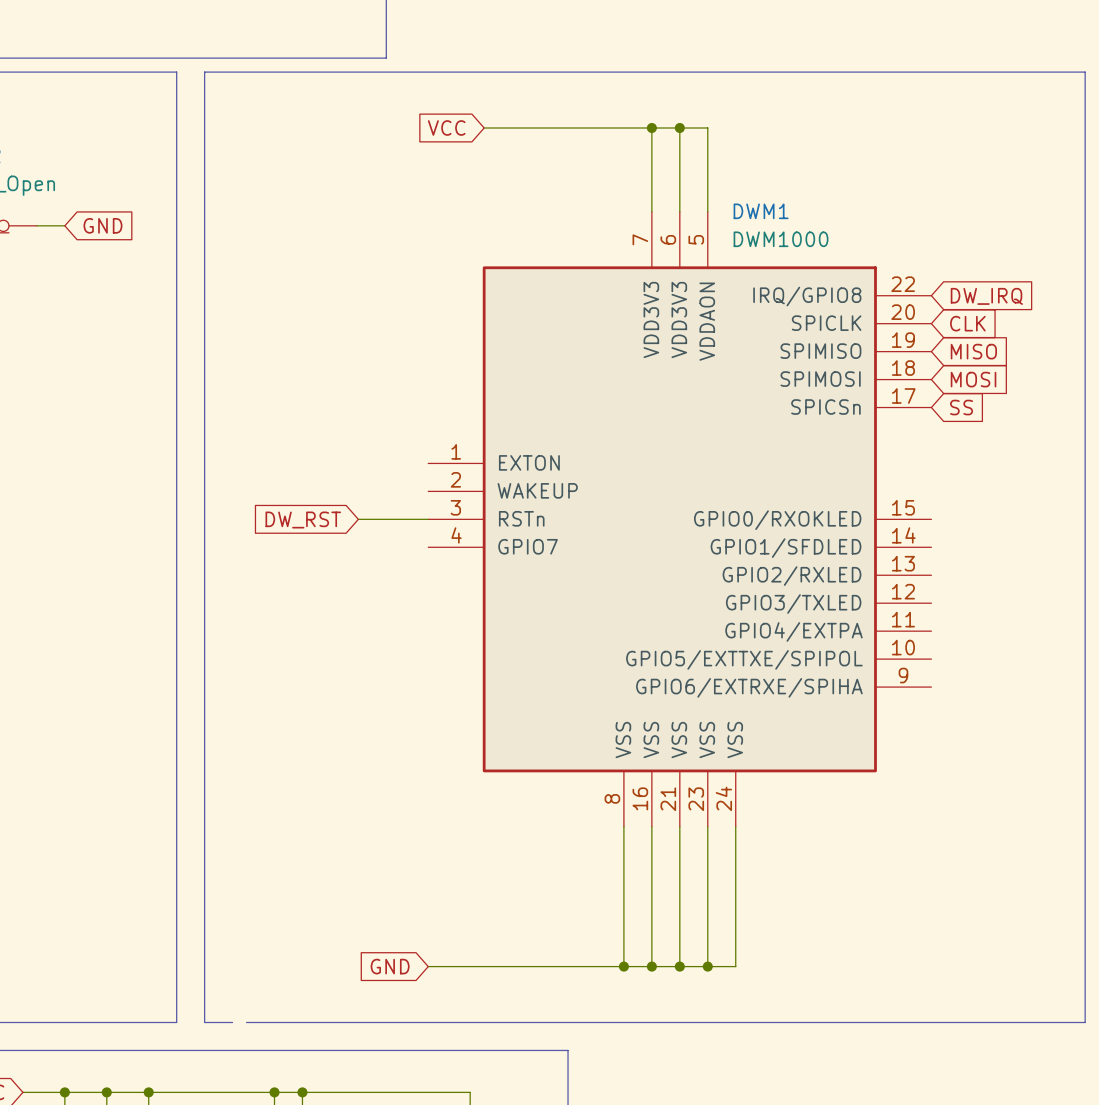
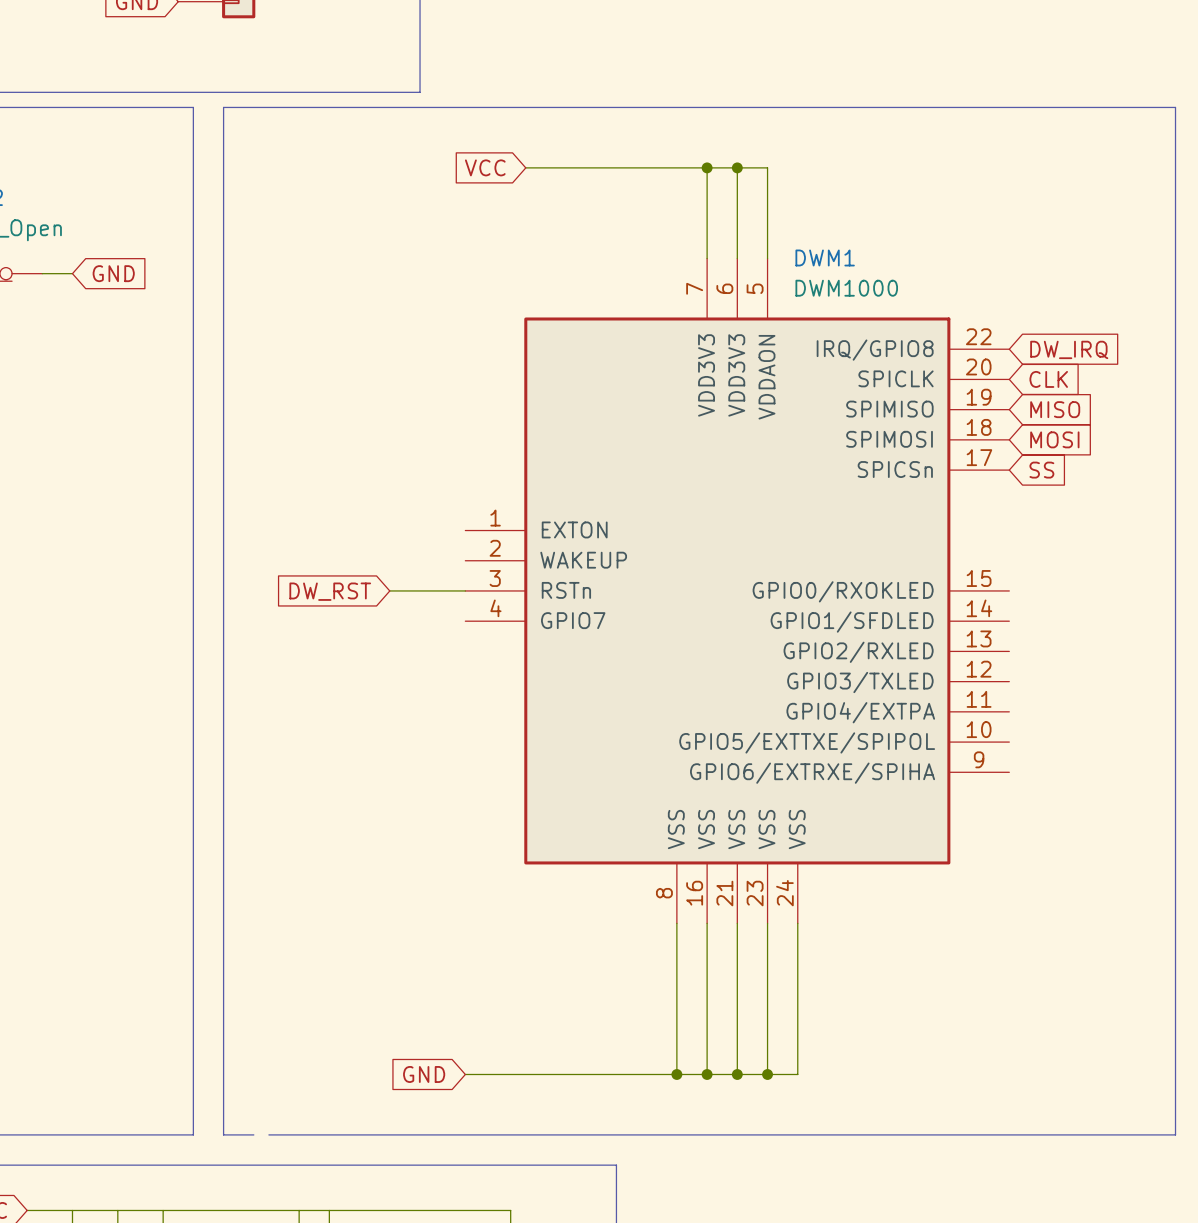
junction: (64, 1092) -> none
junction: (106, 1092) -> none
junction: (148, 1092) -> none
junction: (274, 1092) -> none
junction: (302, 1092) -> none

